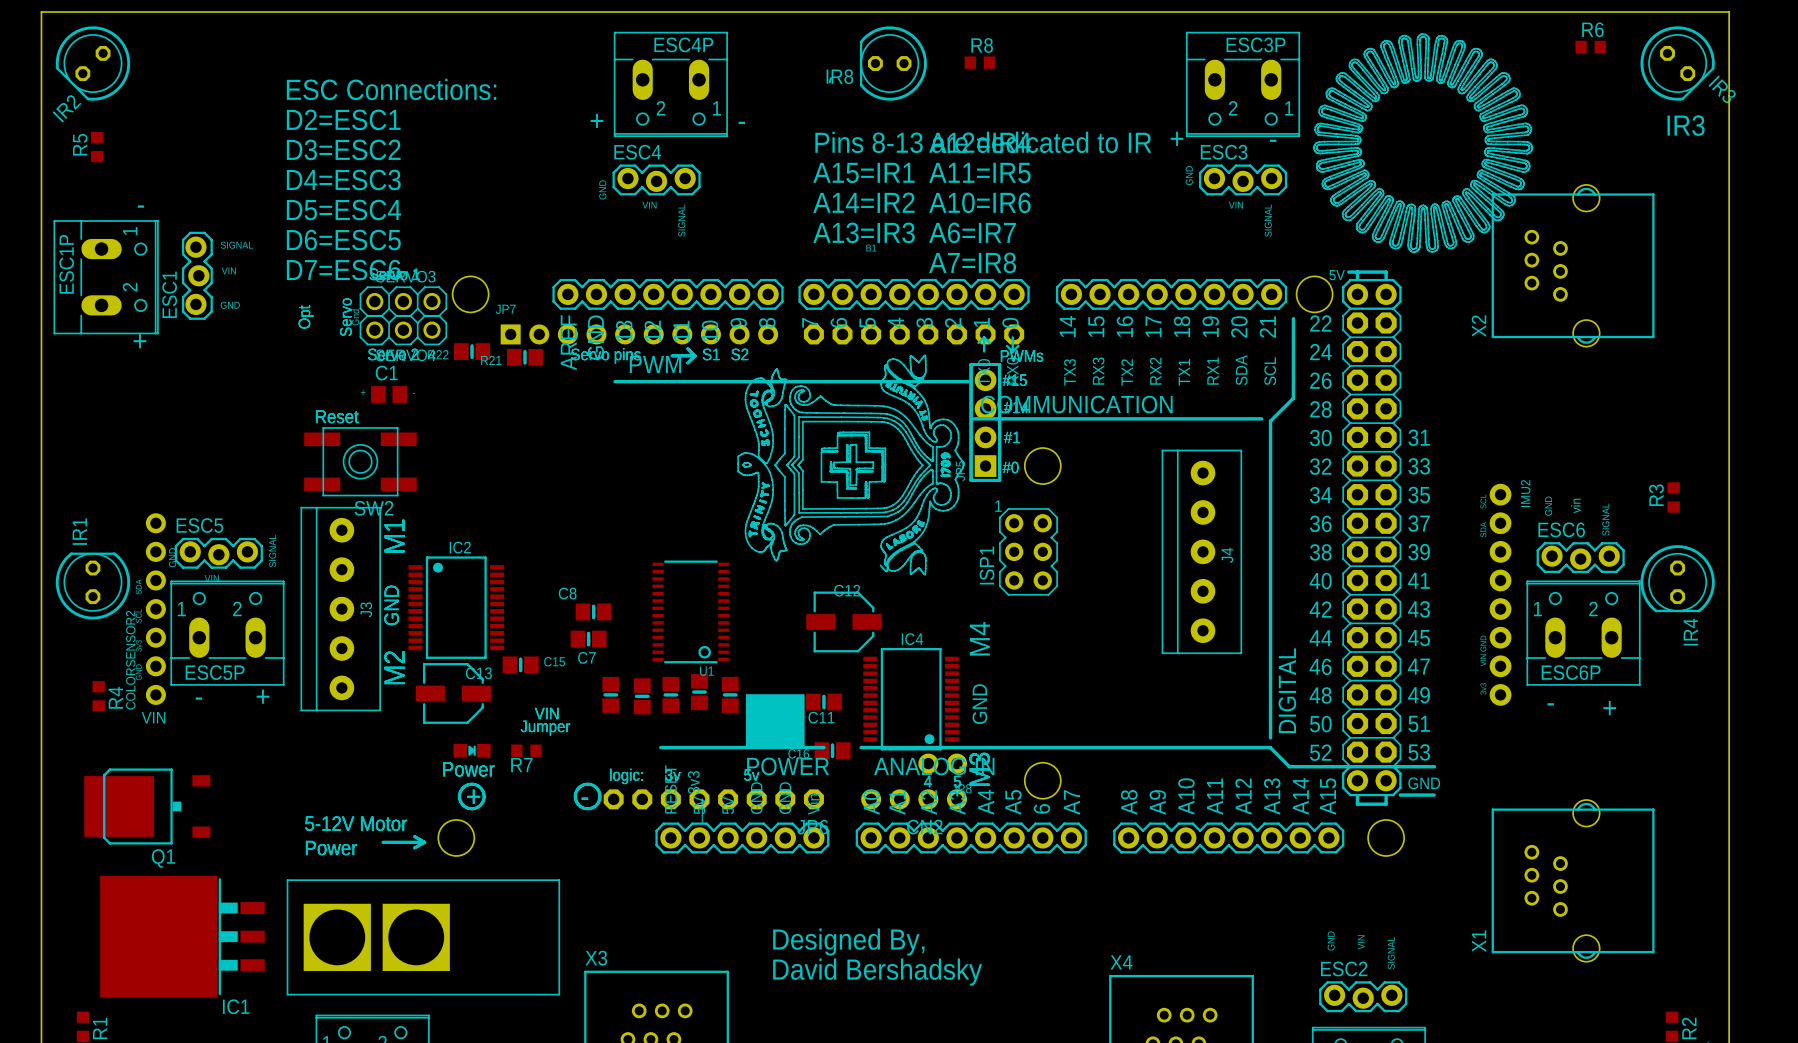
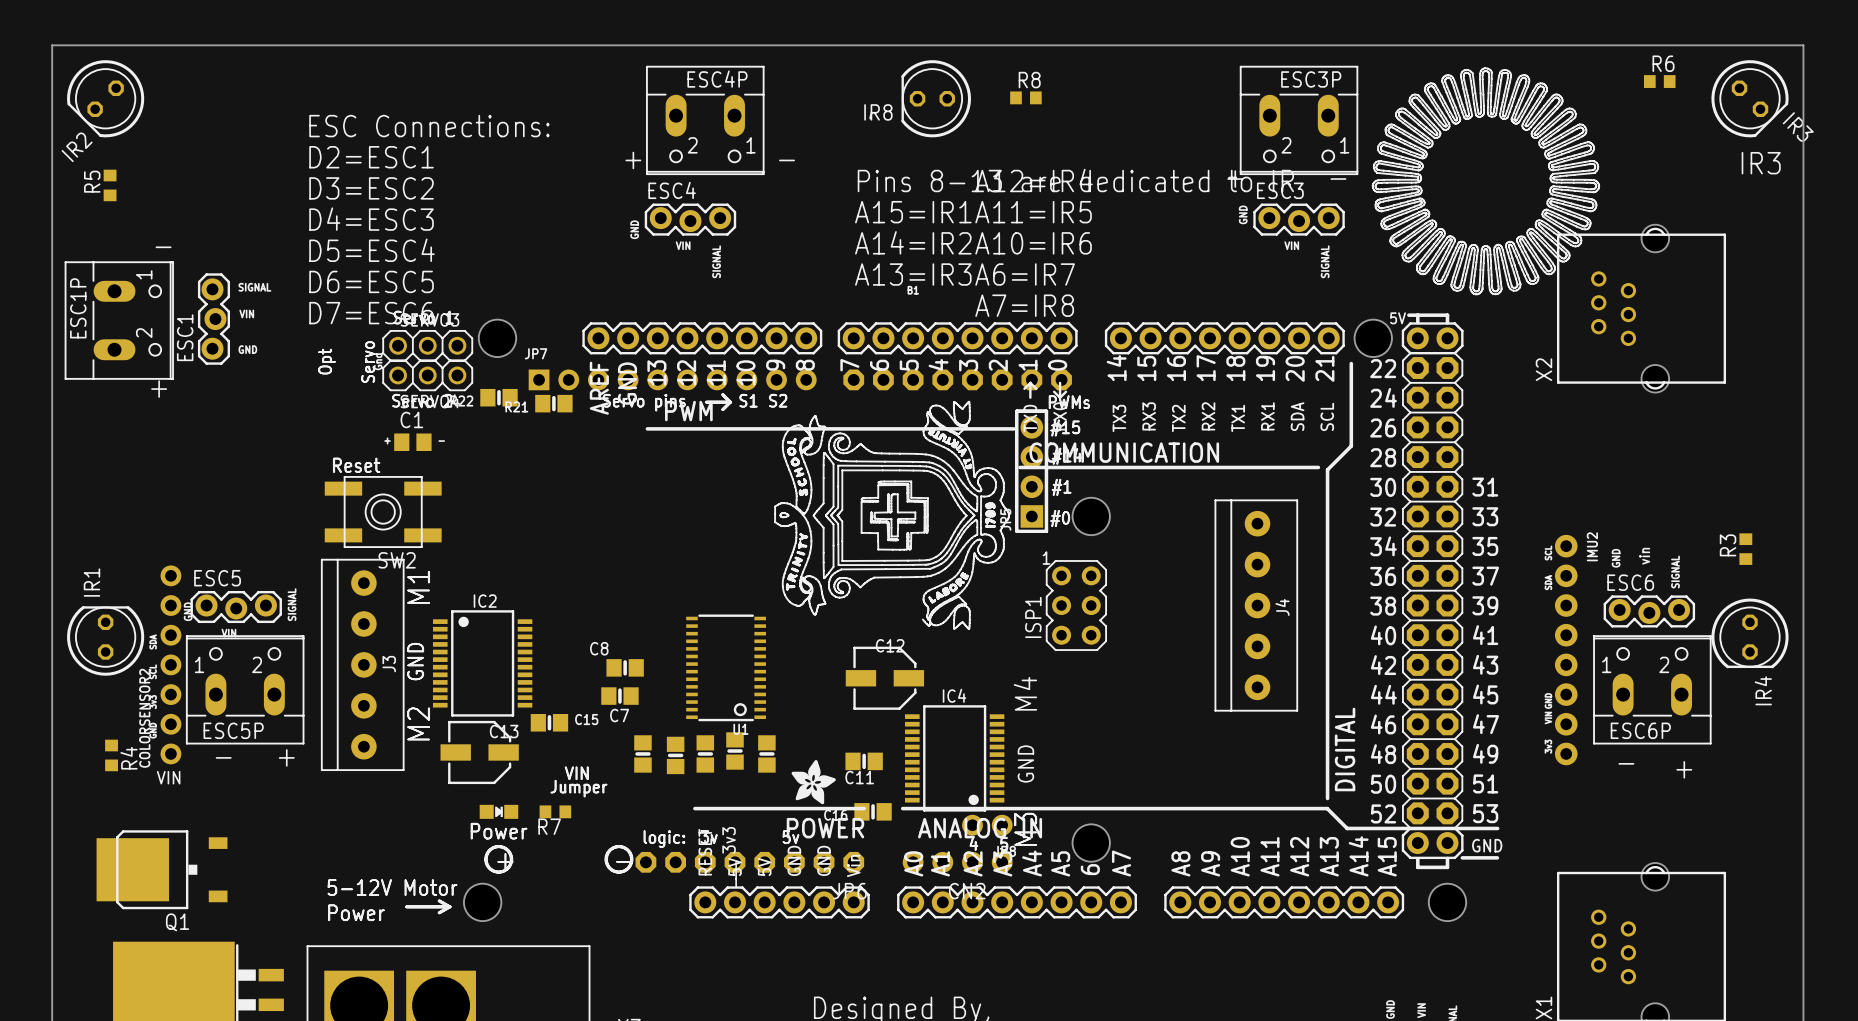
drawing: [745, 694, 805, 747] -> none

